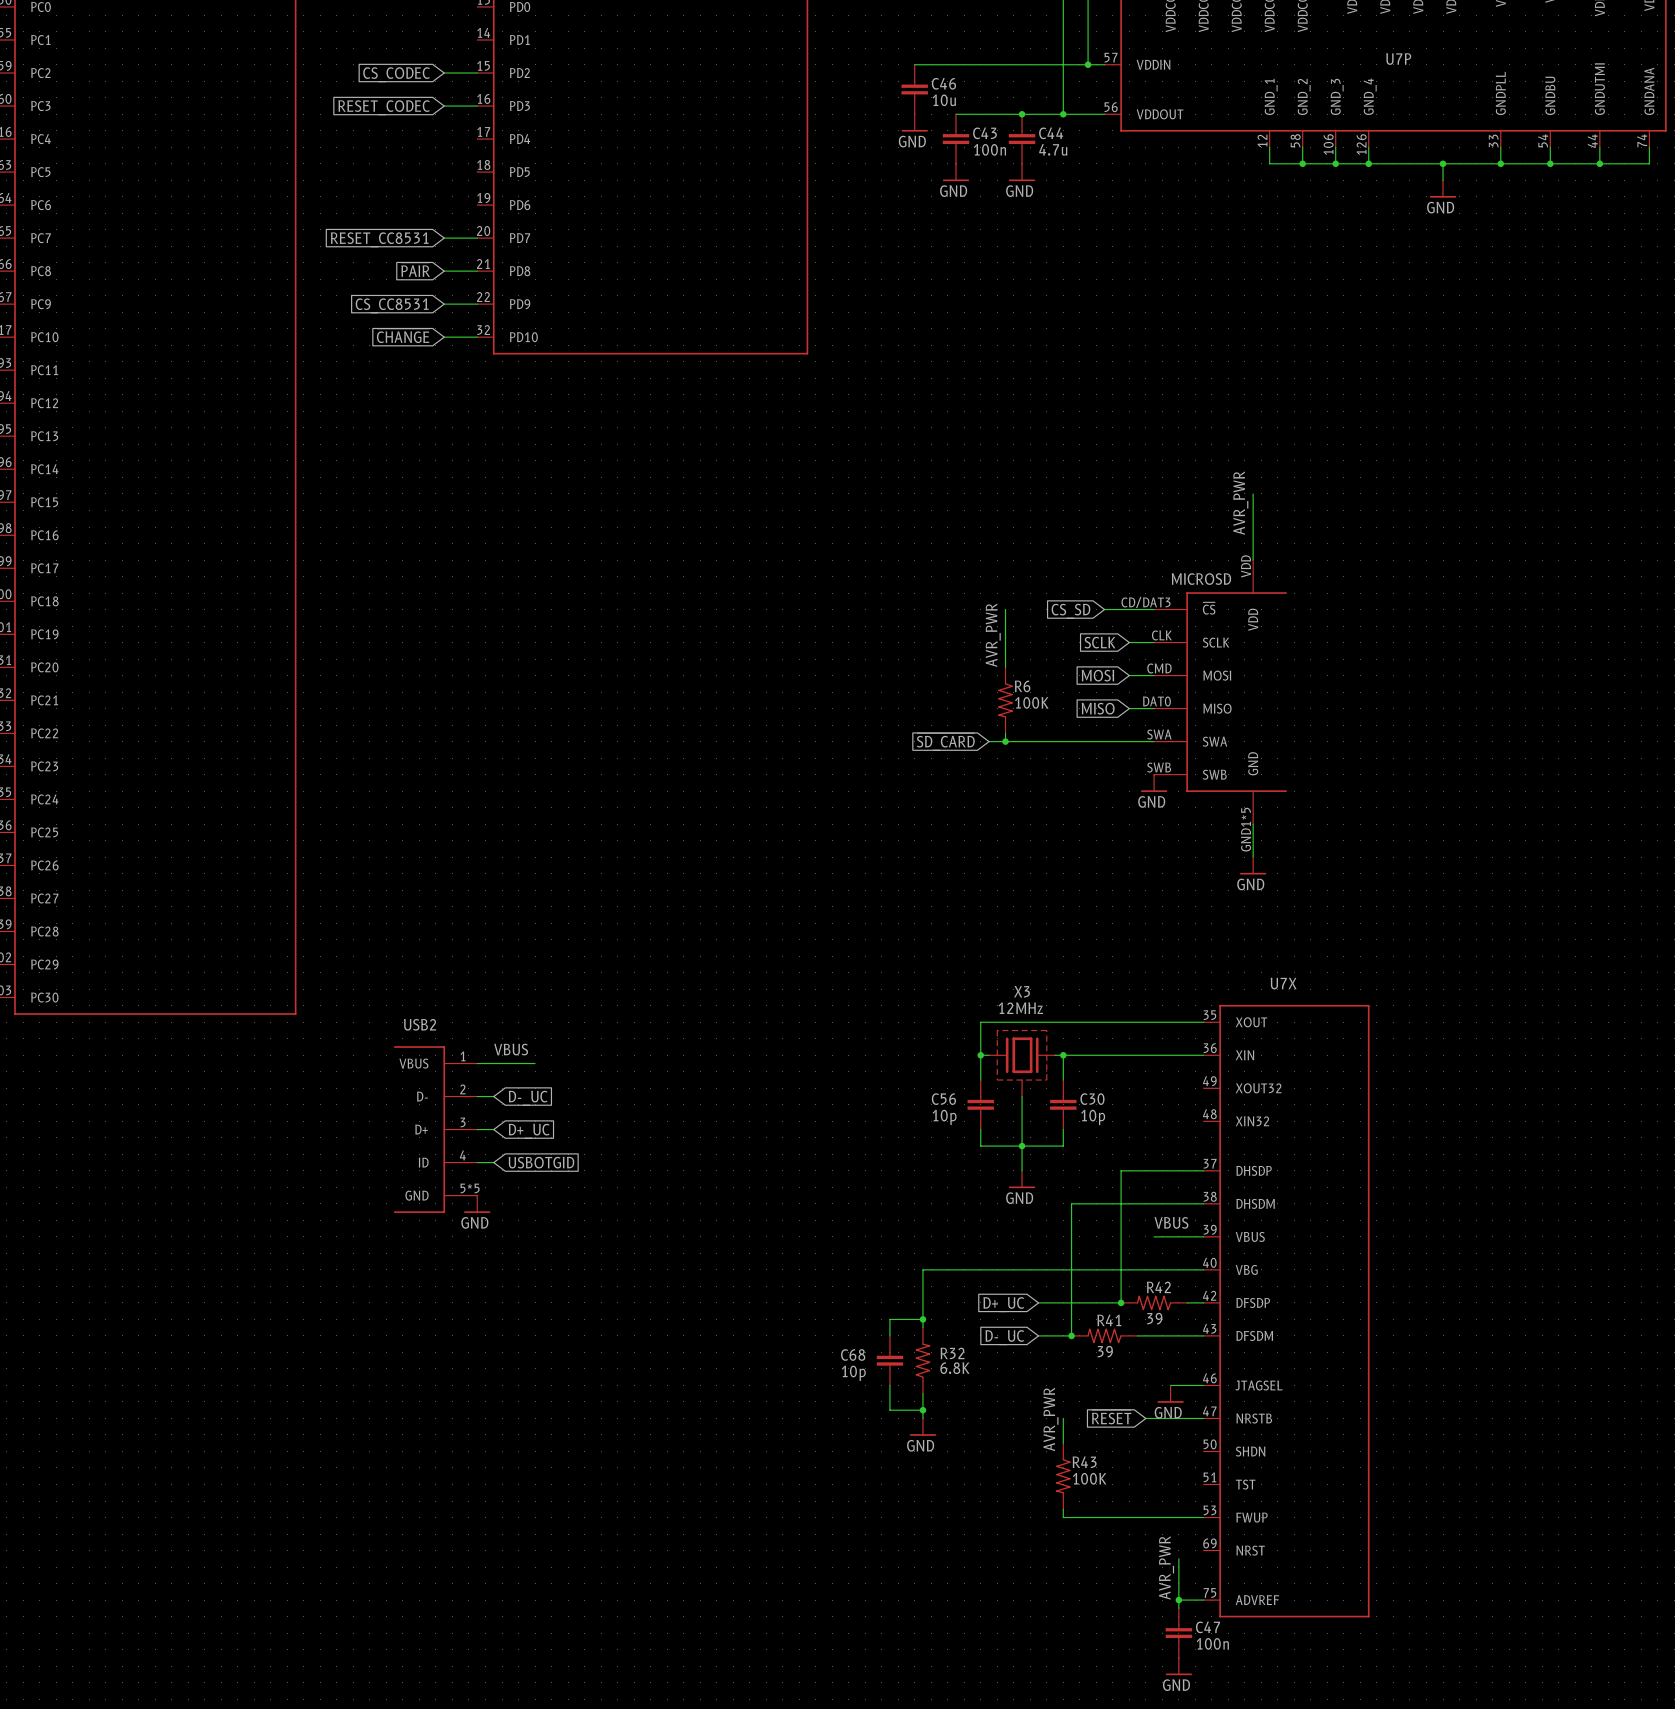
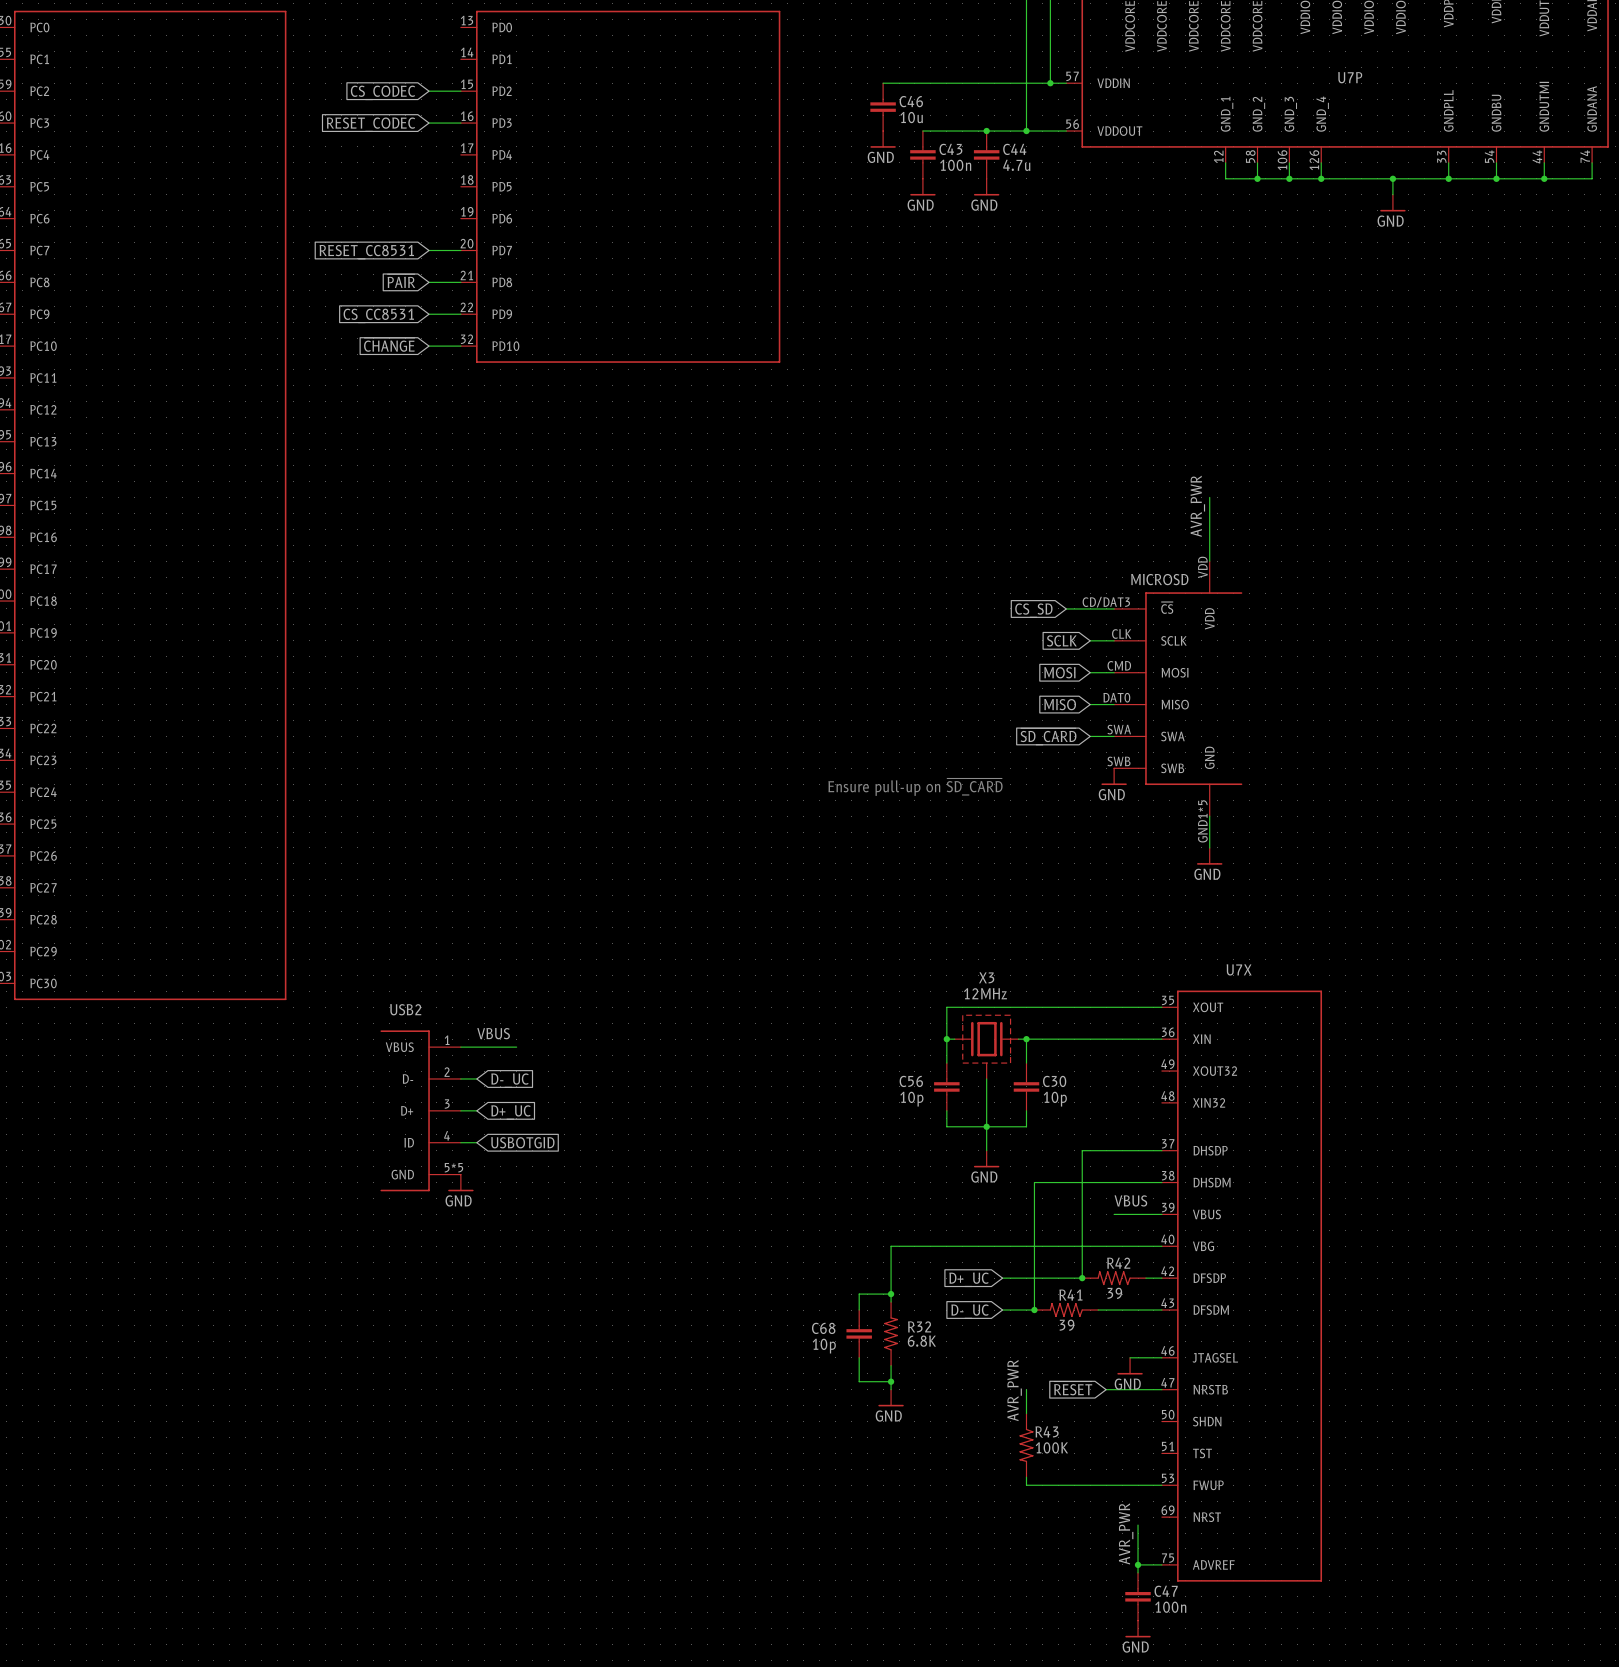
wire: (1005, 609) (1005, 667) -> none
label: AVR_PWR (993, 635) -> none
R6: 100K (1005, 700) -> none
wire: (1005, 733) (1005, 741) -> none
wire: (989, 741) (1129, 741) -> none
junction: (1005, 741) -> none
global label position: ~{SD_CARD} (945, 742) -> ~{SD_CARD} (1048, 736)
text: none -> Ensure pull-up on ~{SD_CARD} (915, 787)

